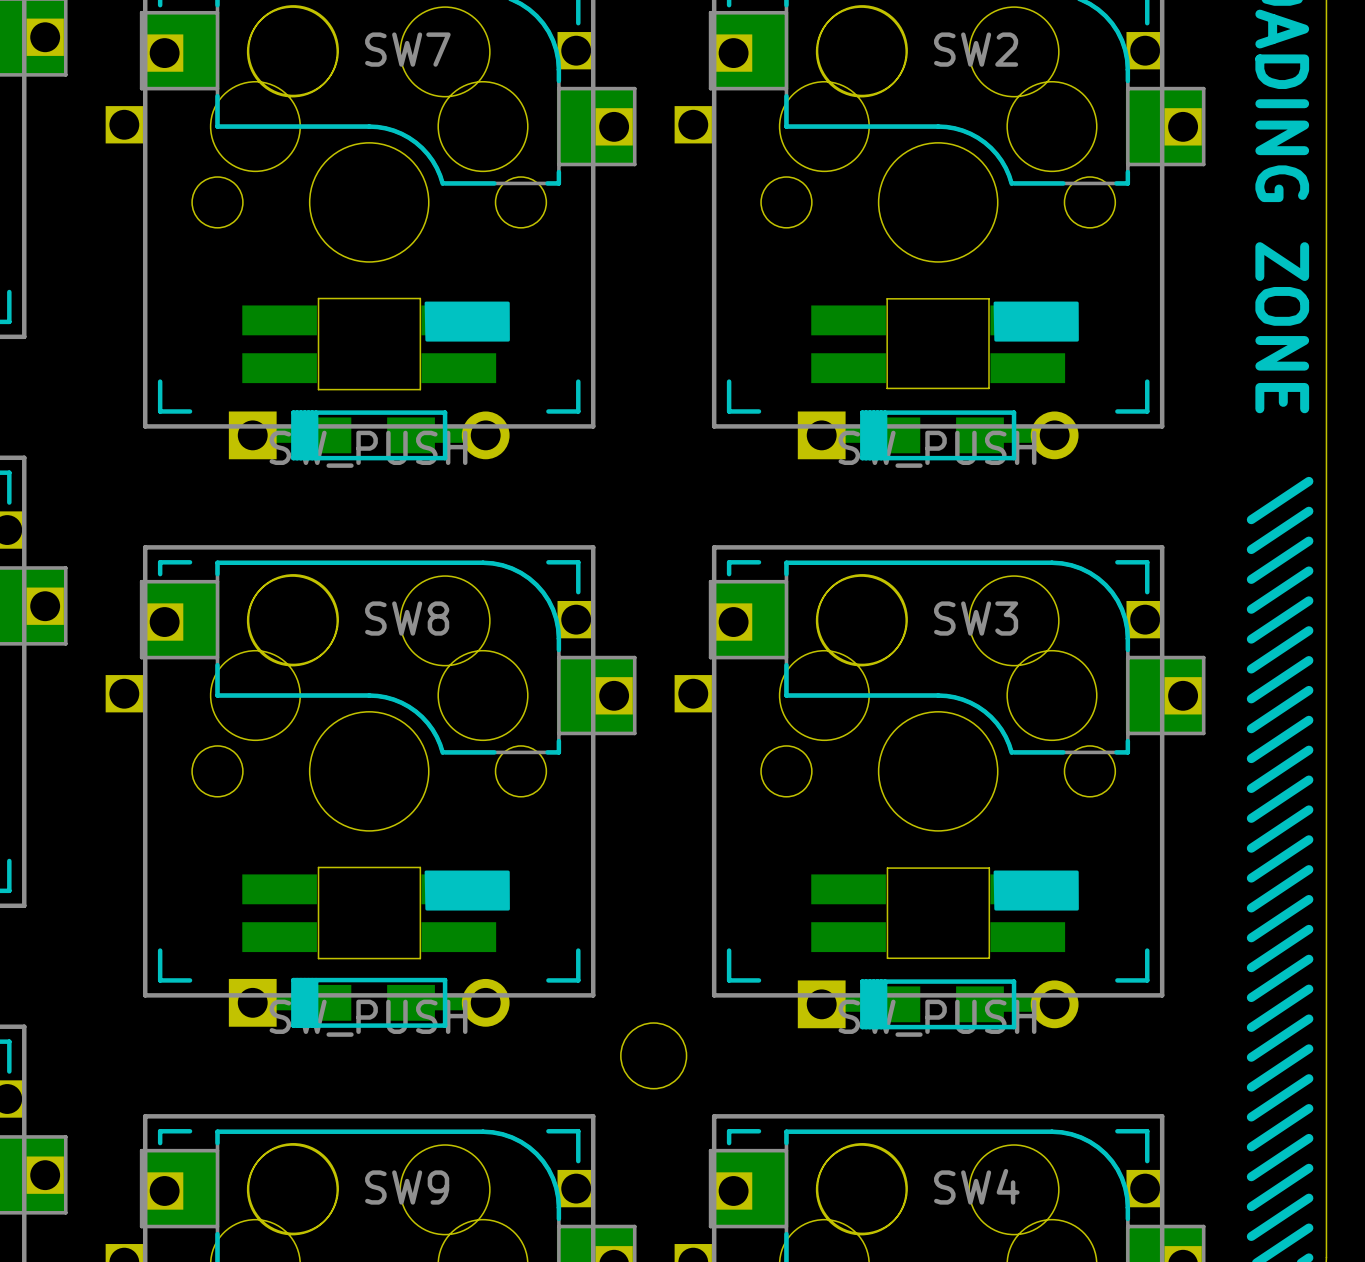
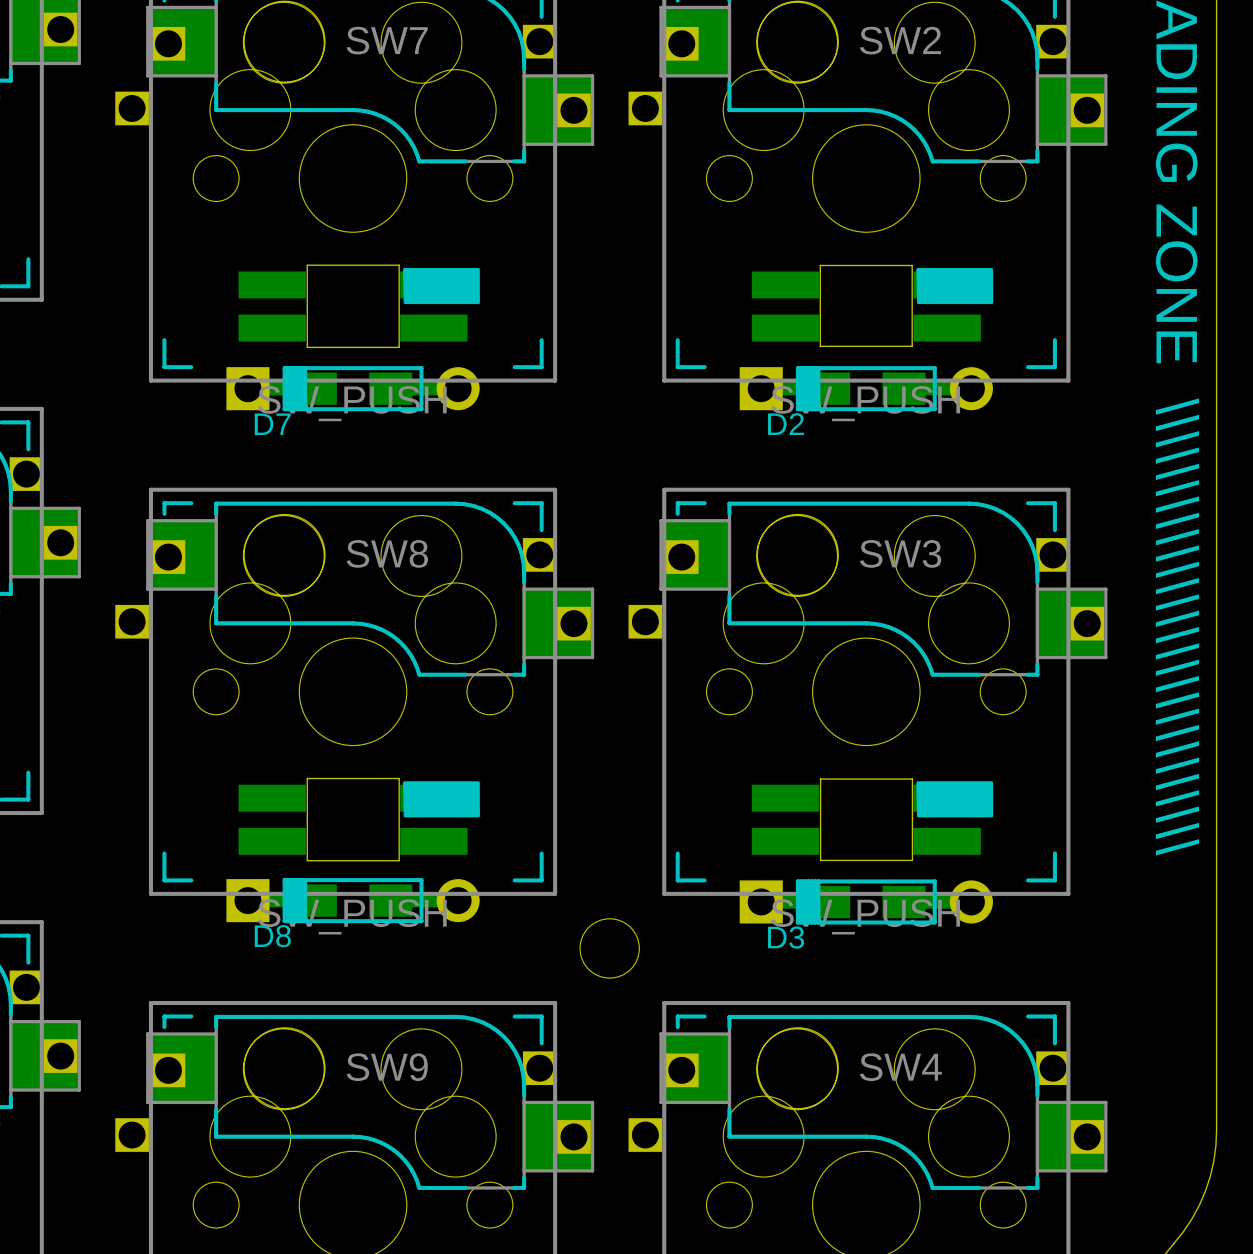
D7 name: none -> D7 (272, 424)
D2 name: none -> D2 (785, 424)
D8 name: none -> D8 (272, 936)
D3 name: none -> D3 (786, 937)

